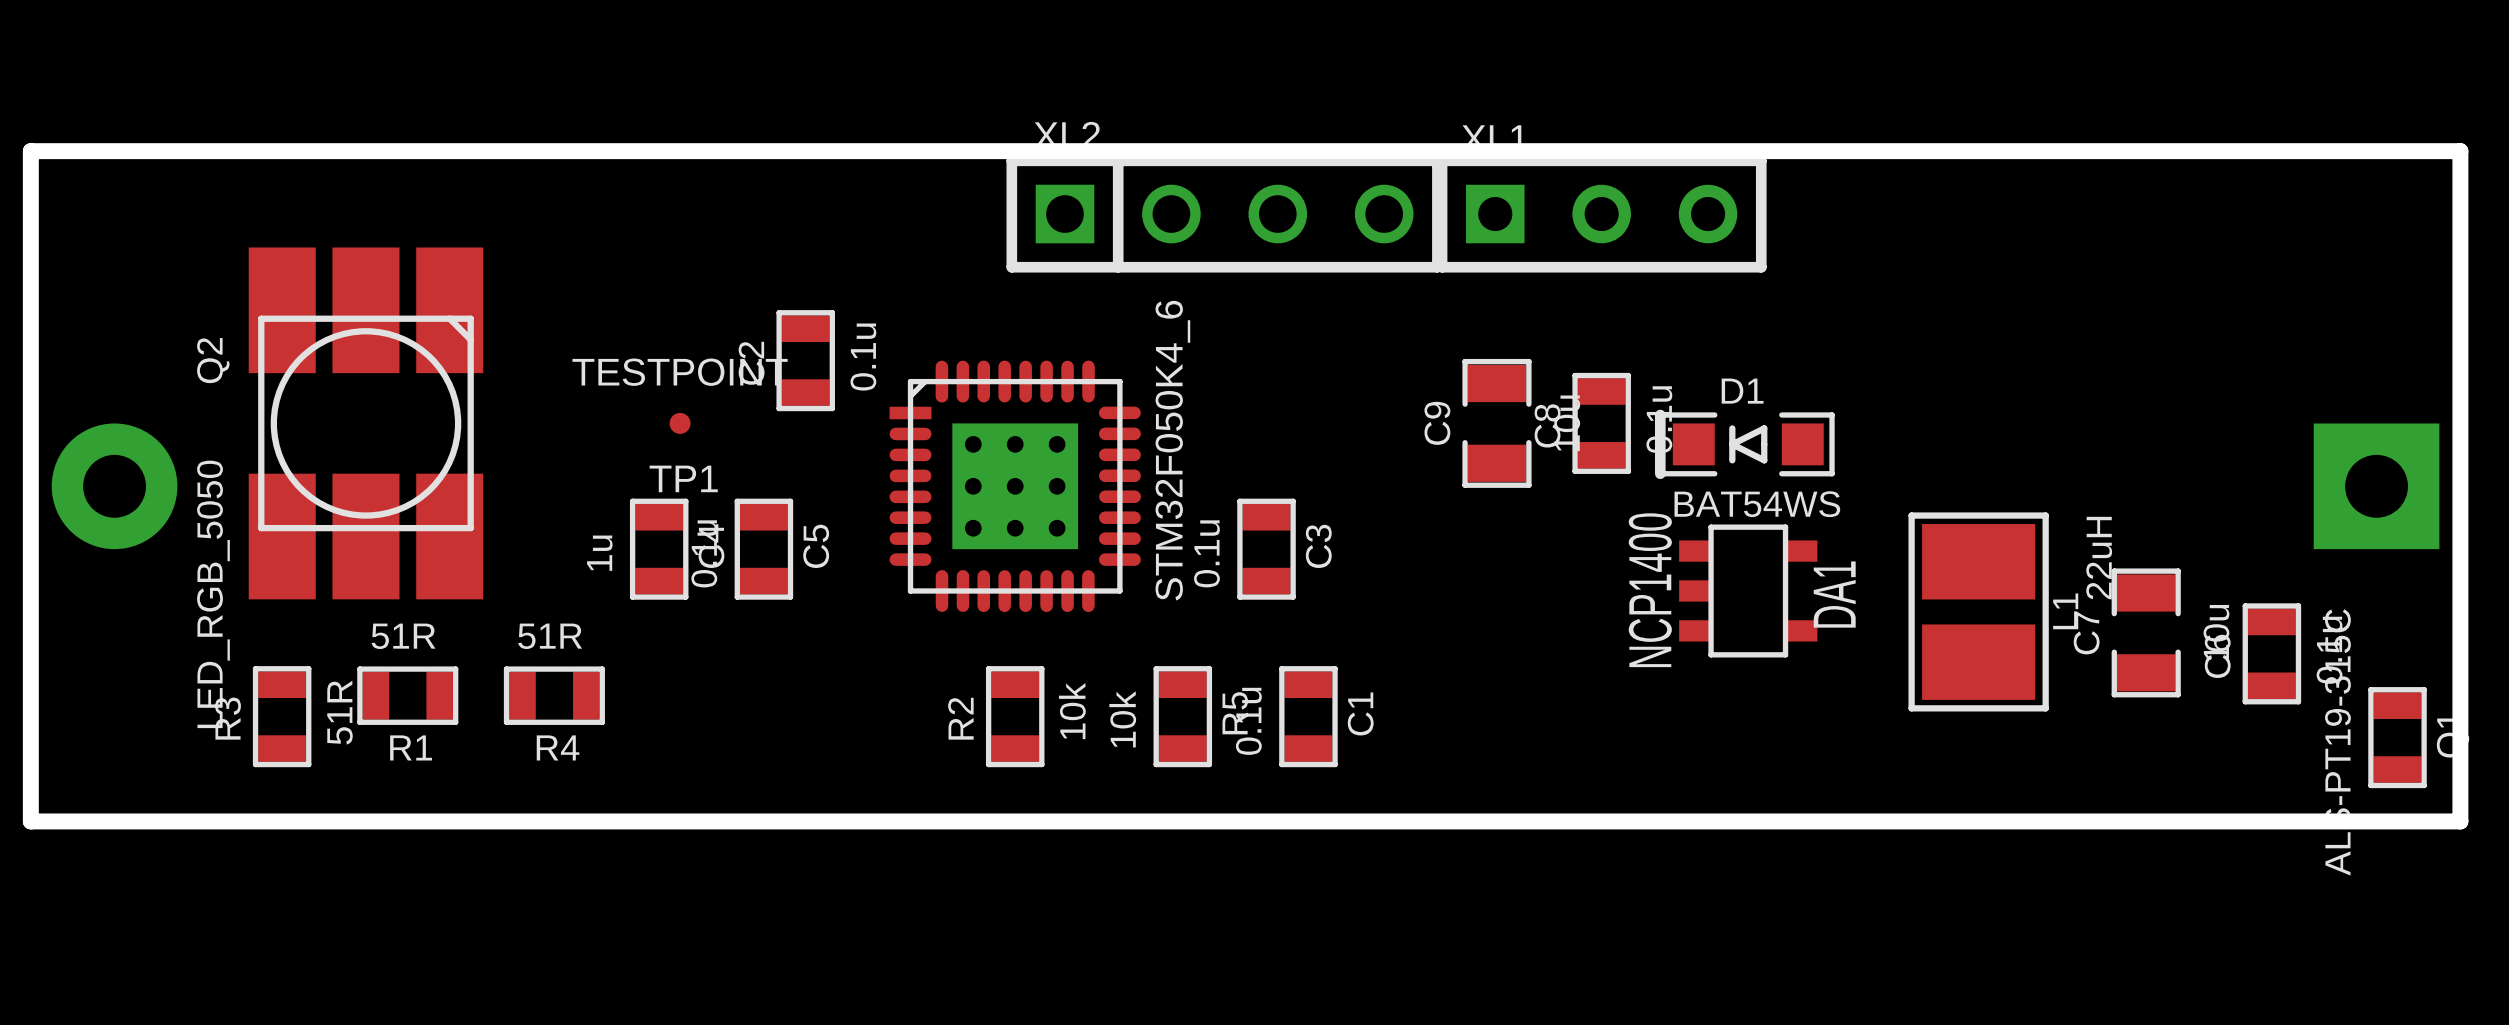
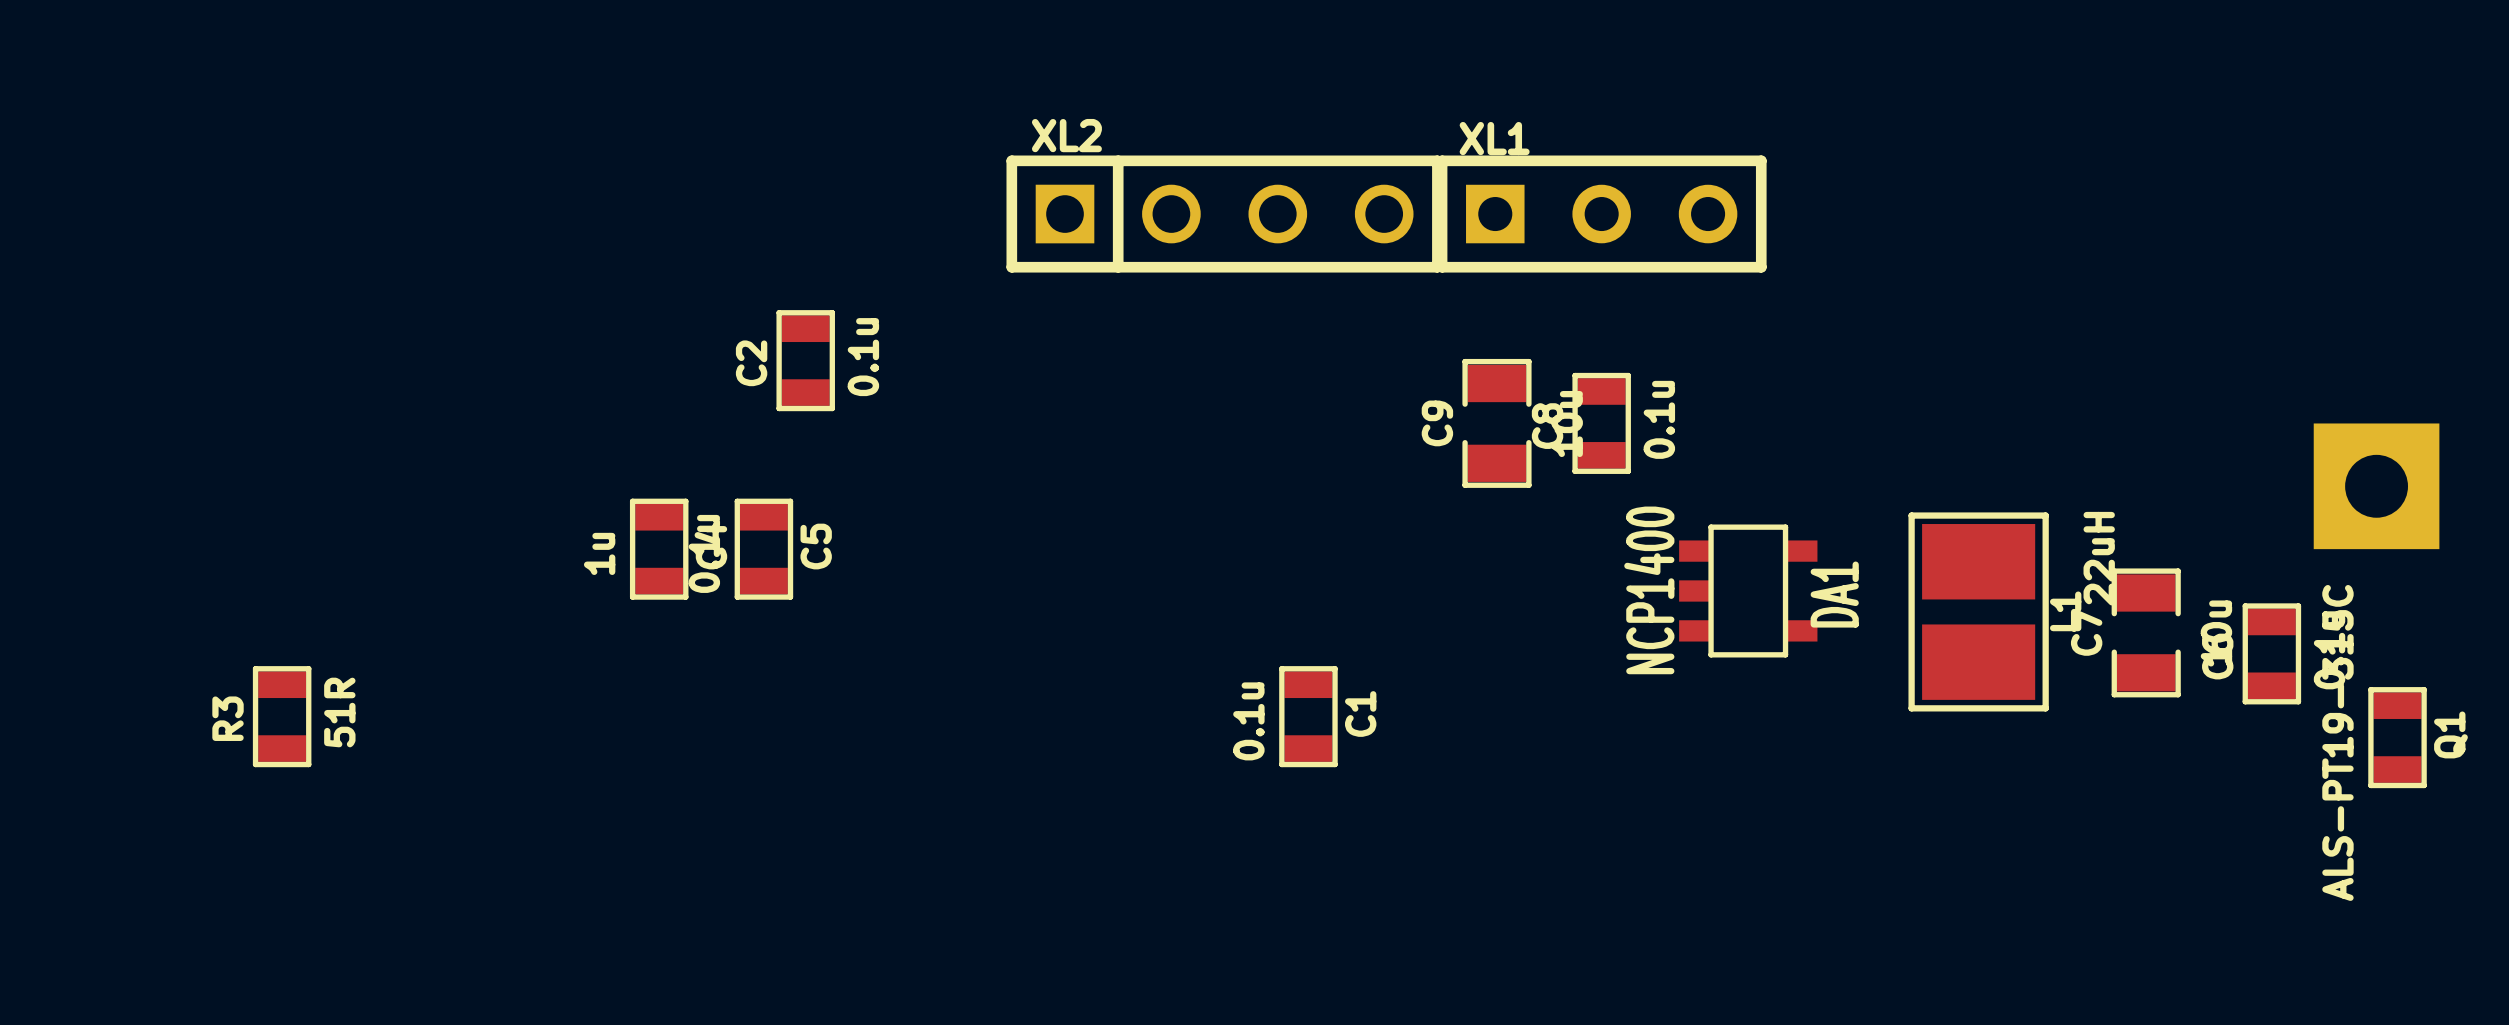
board edge: (30, 151) (30, 821) (2460, 821) (2460, 151) (30, 151) -> none
Q2: LED_RGB_5050 (365, 423) -> none
TP1: TESTPOINT (680, 423) -> none
D1: BAT54WS (1744, 444) -> none
part: (114, 486) -> none
part: STM32F050K4_6 (1015, 486) -> none
C3: 0.1u (1266, 549) -> none
R1: 51R (407, 695) -> none
R4: 51R (554, 695) -> none
R2: 10k (1015, 716) -> none
R5: 10k (1182, 716) -> none

